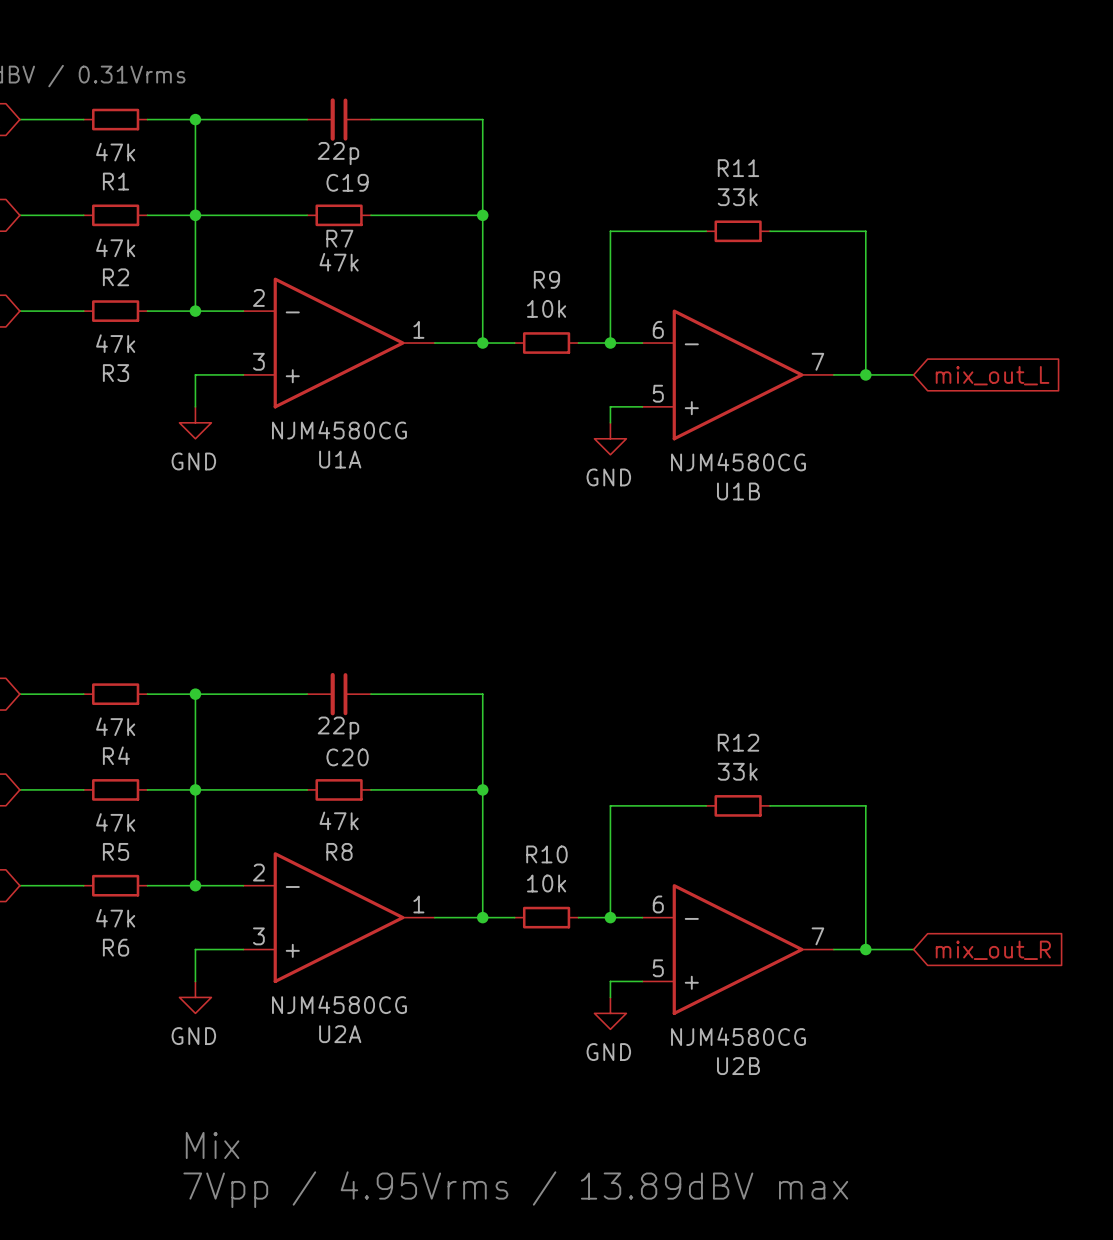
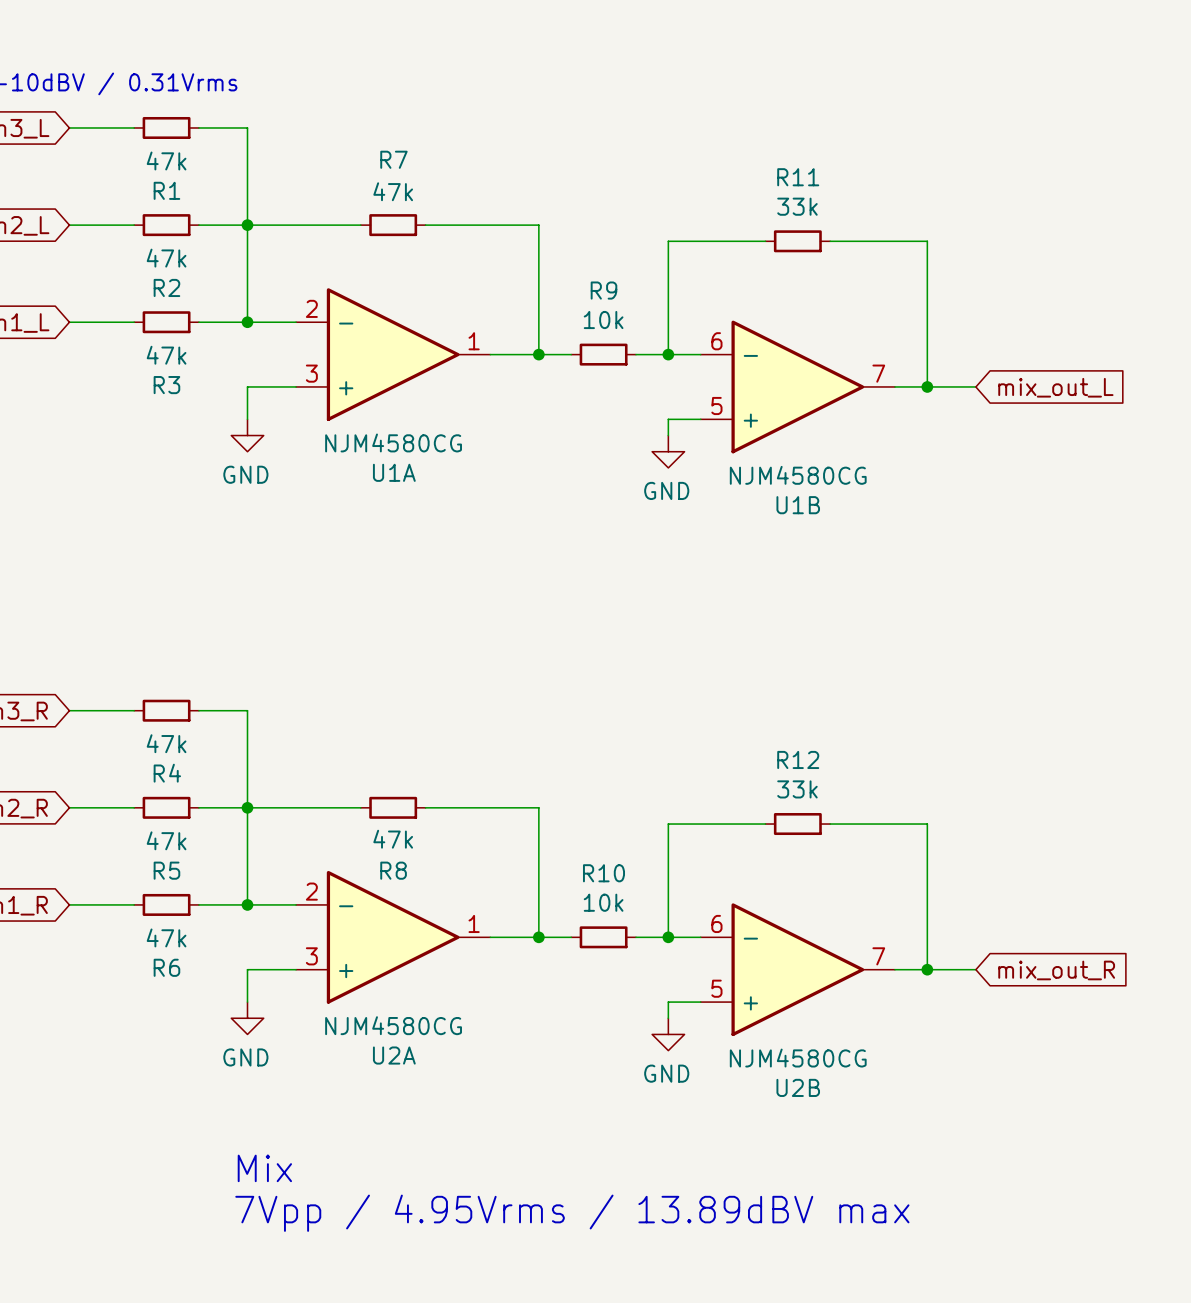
wire: (195, 119) (307, 119) -> none
junction: (195, 119) -> none
C19: 22p (339, 119) -> none
wire: (371, 119) (482, 119) (482, 215) -> none
junction: (482, 215) -> none
R7 name position: R7 (339, 238) -> R7 (393, 159)
R7 value position: 47k (339, 262) -> 47k (393, 191)
wire: (195, 694) (307, 694) -> none
junction: (195, 694) -> none
C20: 22p (339, 694) -> none
wire: (371, 694) (482, 694) (482, 789) -> none
junction: (482, 789) -> none

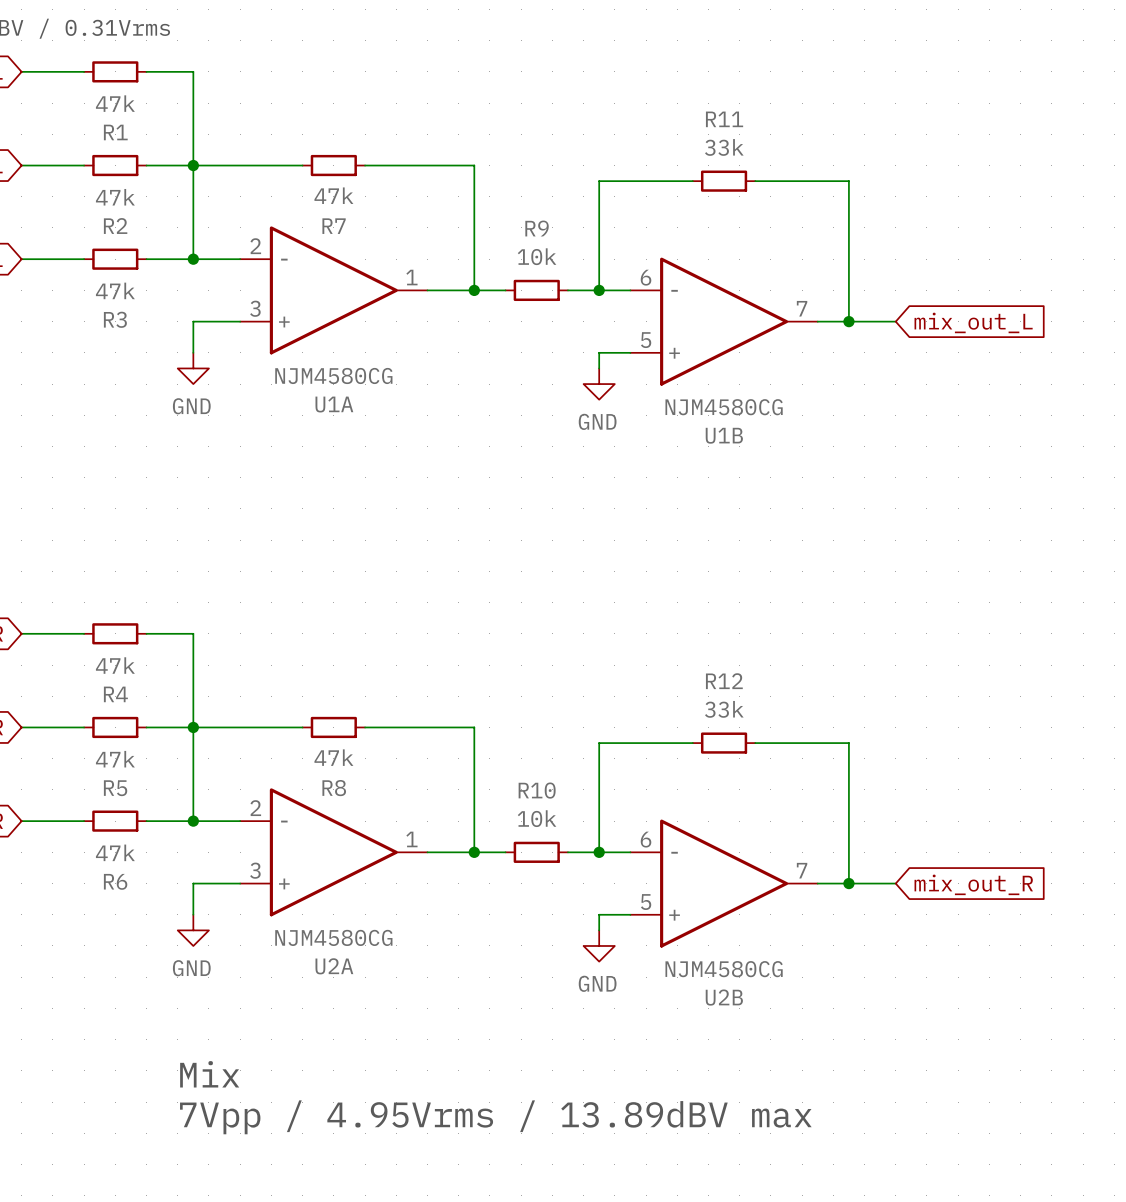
R7 name position: R7 (393, 159) -> R7 (334, 226)
R7 value position: 47k (393, 191) -> 47k (333, 195)

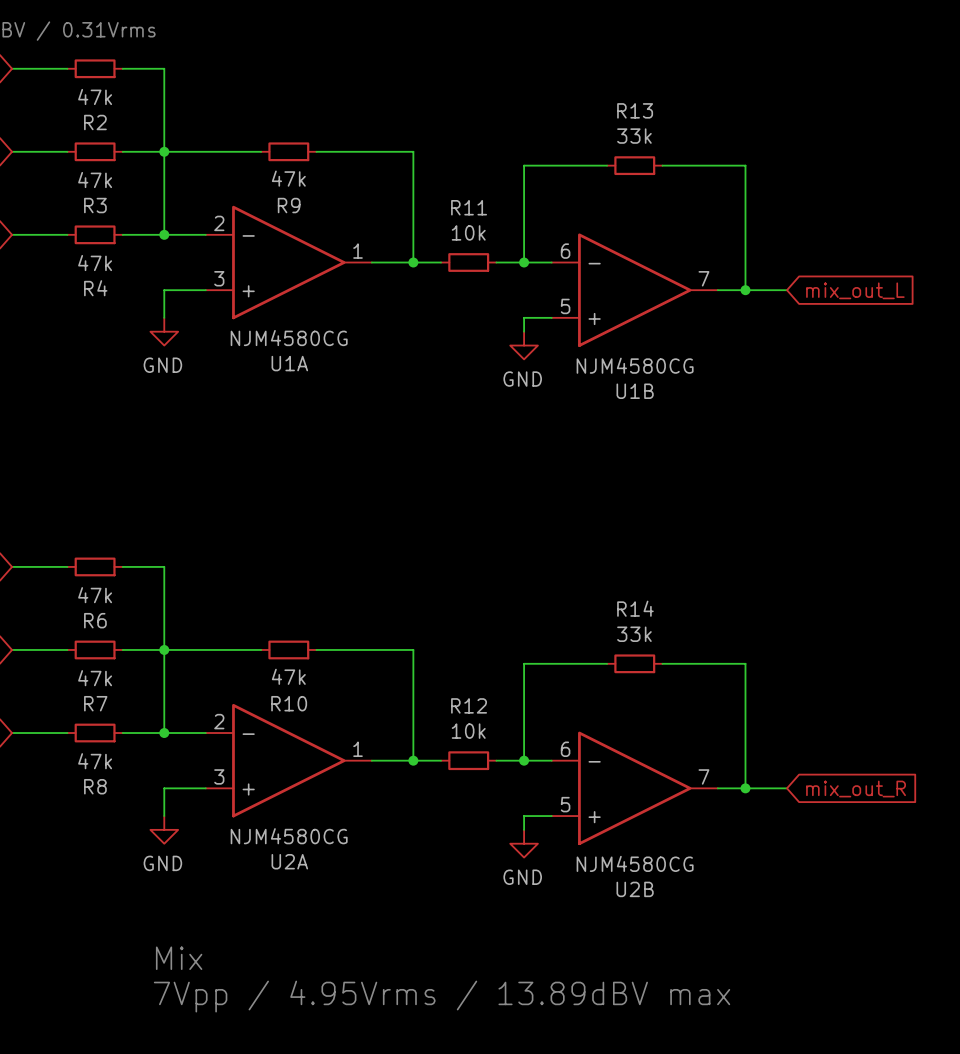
R11 name: R11 (724, 119) -> R13 (635, 110)
R1 name: R1 (115, 132) -> R2 (95, 122)
R2 name: R2 (115, 226) -> R3 (95, 205)
R7 name: R7 (334, 226) -> R9 (289, 205)
R9 name: R9 (537, 228) -> R11 (469, 207)
R3 name: R3 (115, 319) -> R4 (95, 288)
R12 name: R12 (724, 681) -> R14 (635, 608)
R4 name: R4 (115, 694) -> R6 (95, 620)
R5 name: R5 (115, 788) -> R7 (95, 703)
R8 name: R8 (334, 788) -> R10 (289, 703)
R10 name: R10 (537, 790) -> R12 (469, 705)
R6 name: R6 (115, 881) -> R8 (95, 786)

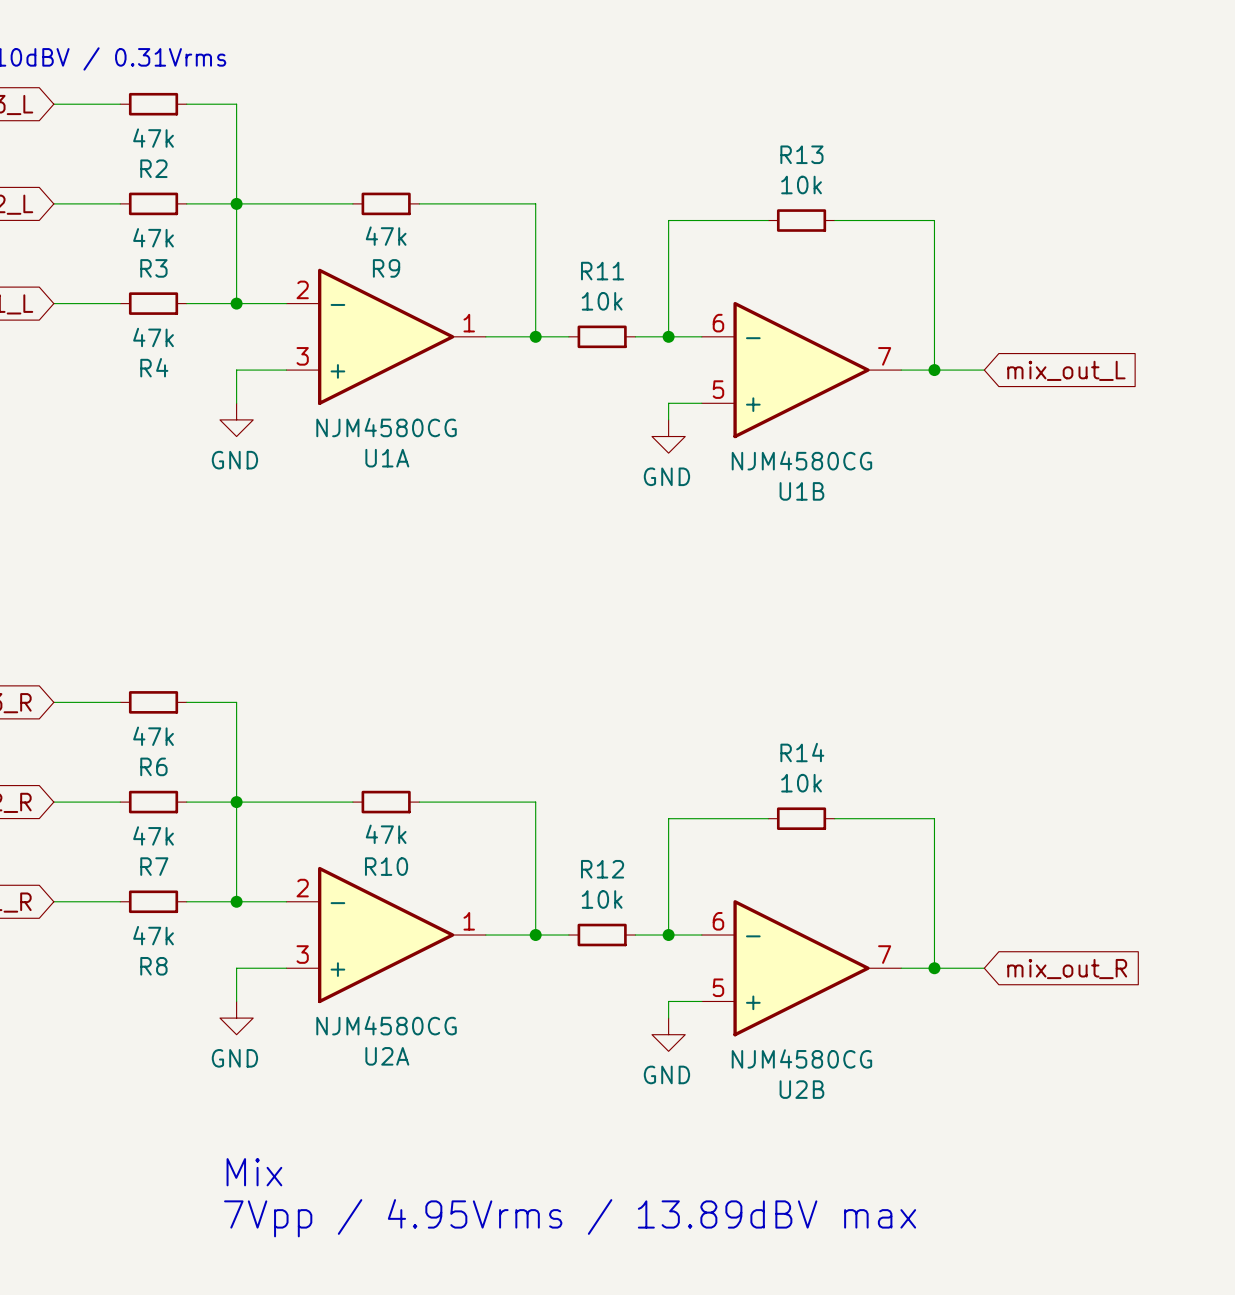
R13 value: 33k (634, 136) -> 10k (801, 185)
R14 value: 33k (634, 634) -> 10k (801, 783)

